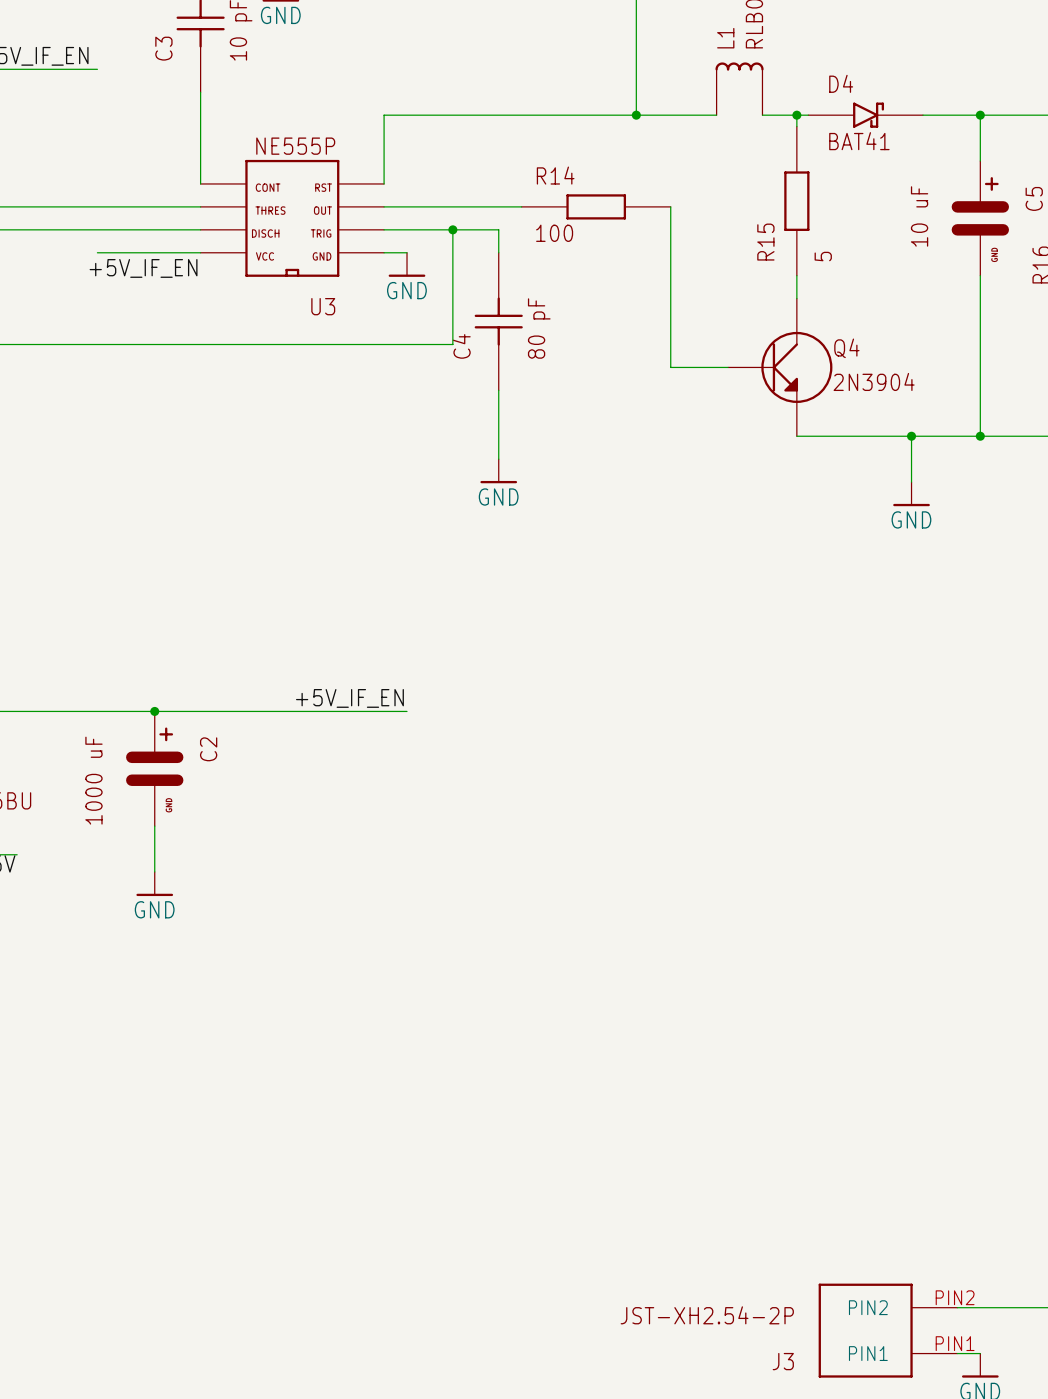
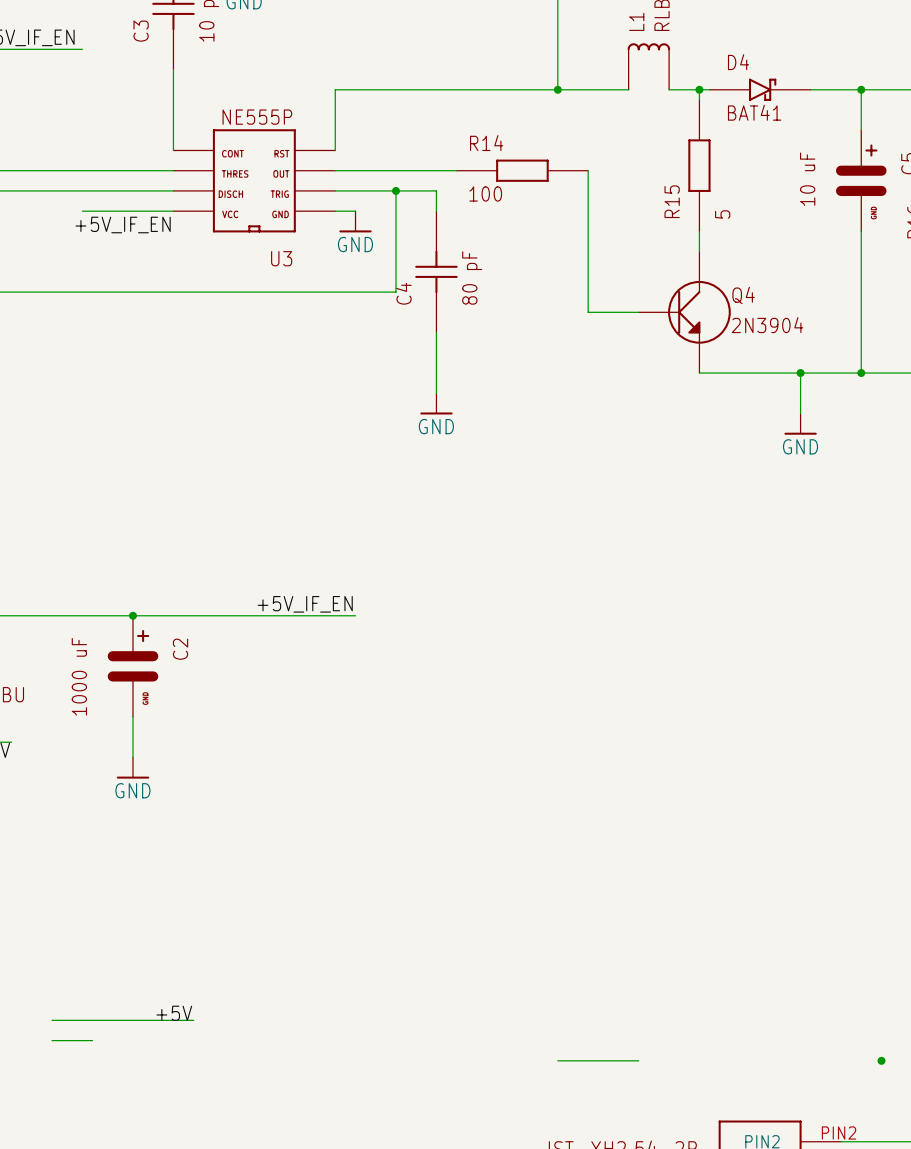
label: none -> +5V (174, 1013)
wire: none -> (52, 1020) (193, 1020)
wire: none -> (52, 1040) (92, 1040)
wire: none -> (557, 1060) (638, 1060)
junction: none -> (881, 1060)

